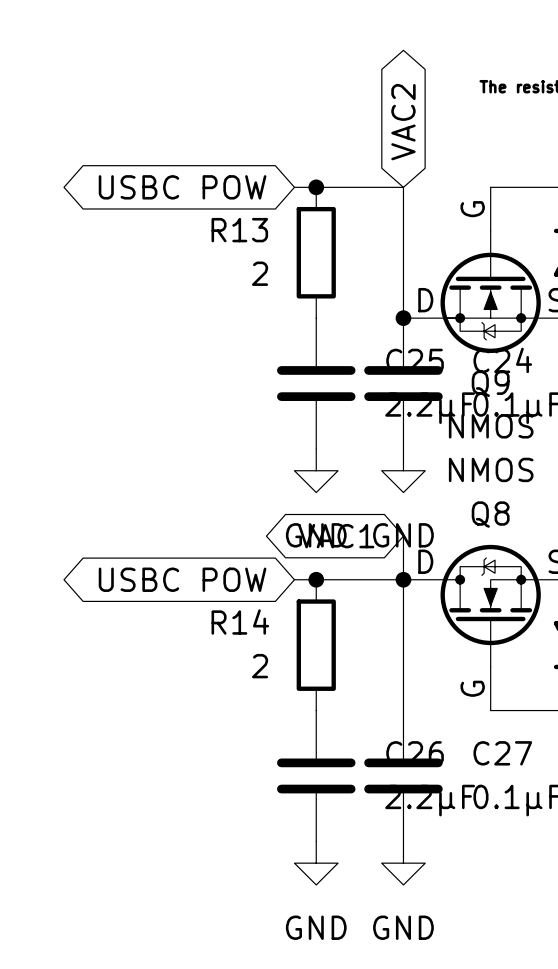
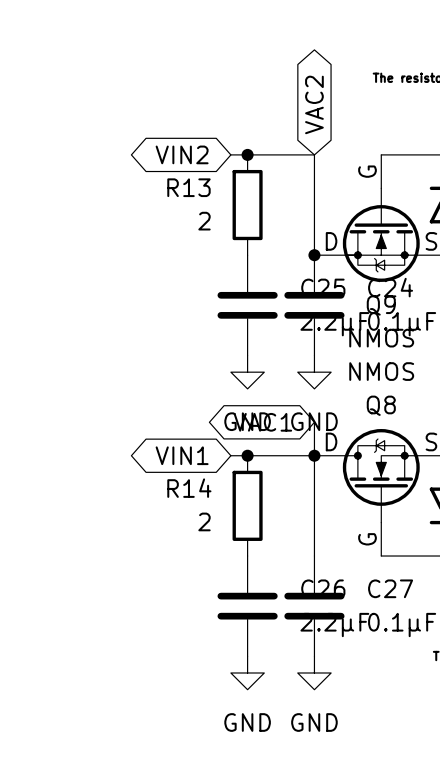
global label: USBC POW (182, 187) -> VIN2 (182, 154)
global label: USBC POW (182, 579) -> VIN1 (182, 455)

